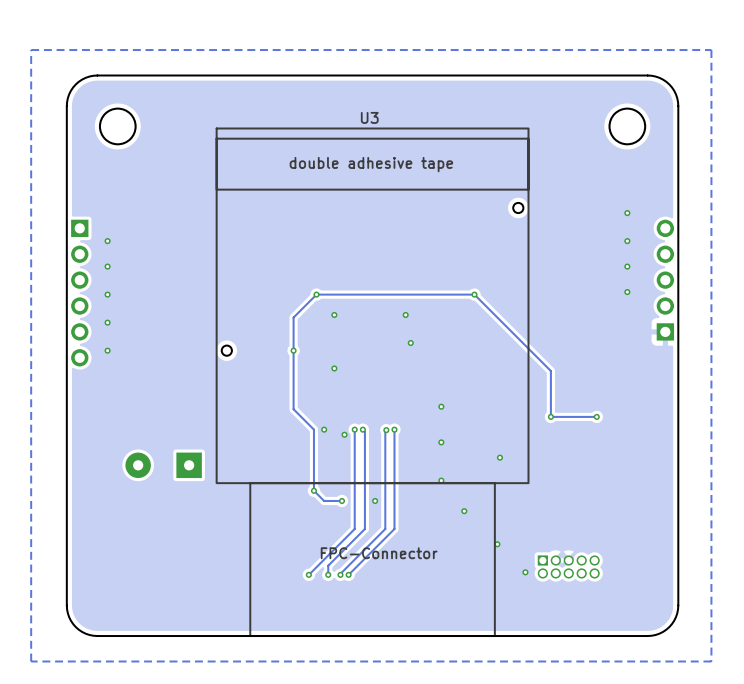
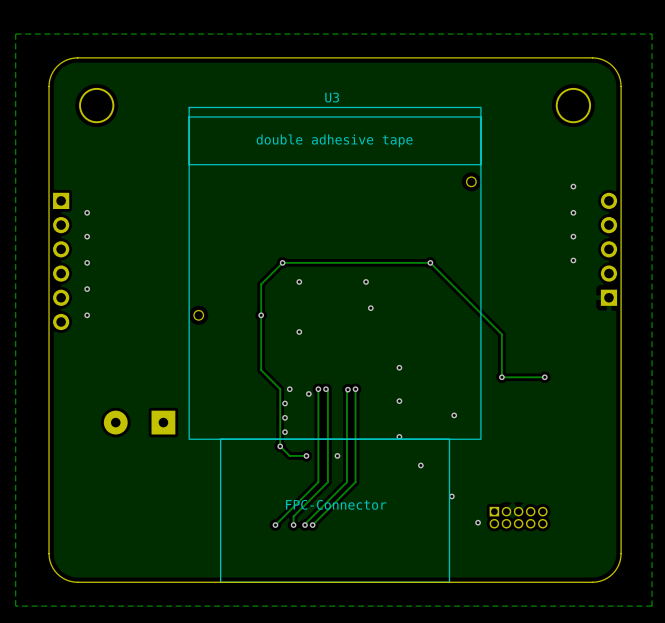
via: none -> (285, 403)
via: none -> (285, 417)
via: none -> (285, 432)

